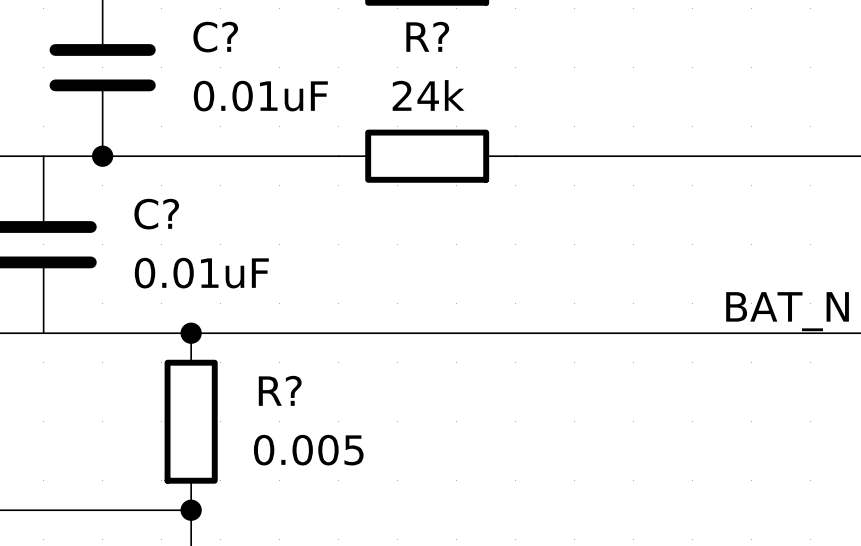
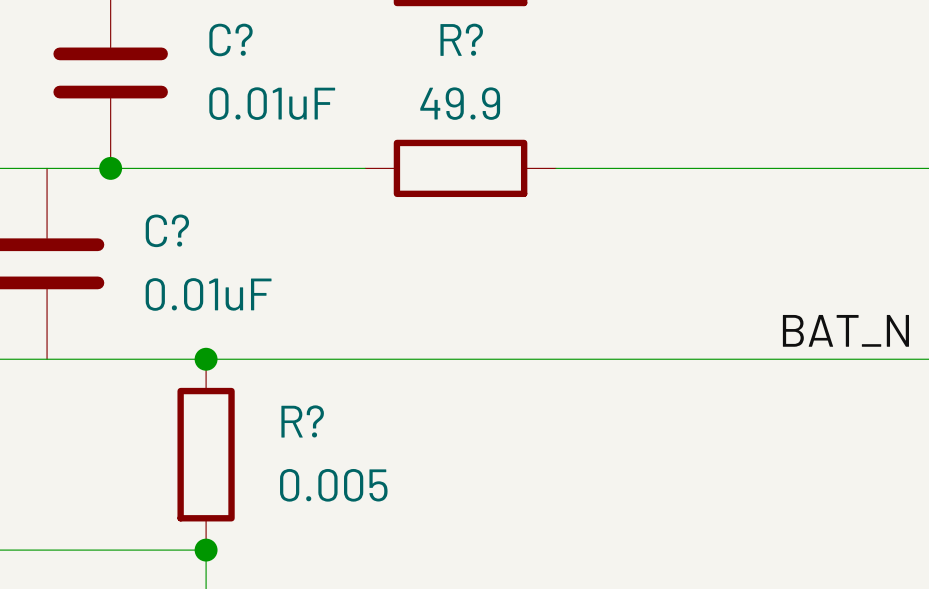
R? value: 24k (428, 95) -> 49.9 (460, 103)

